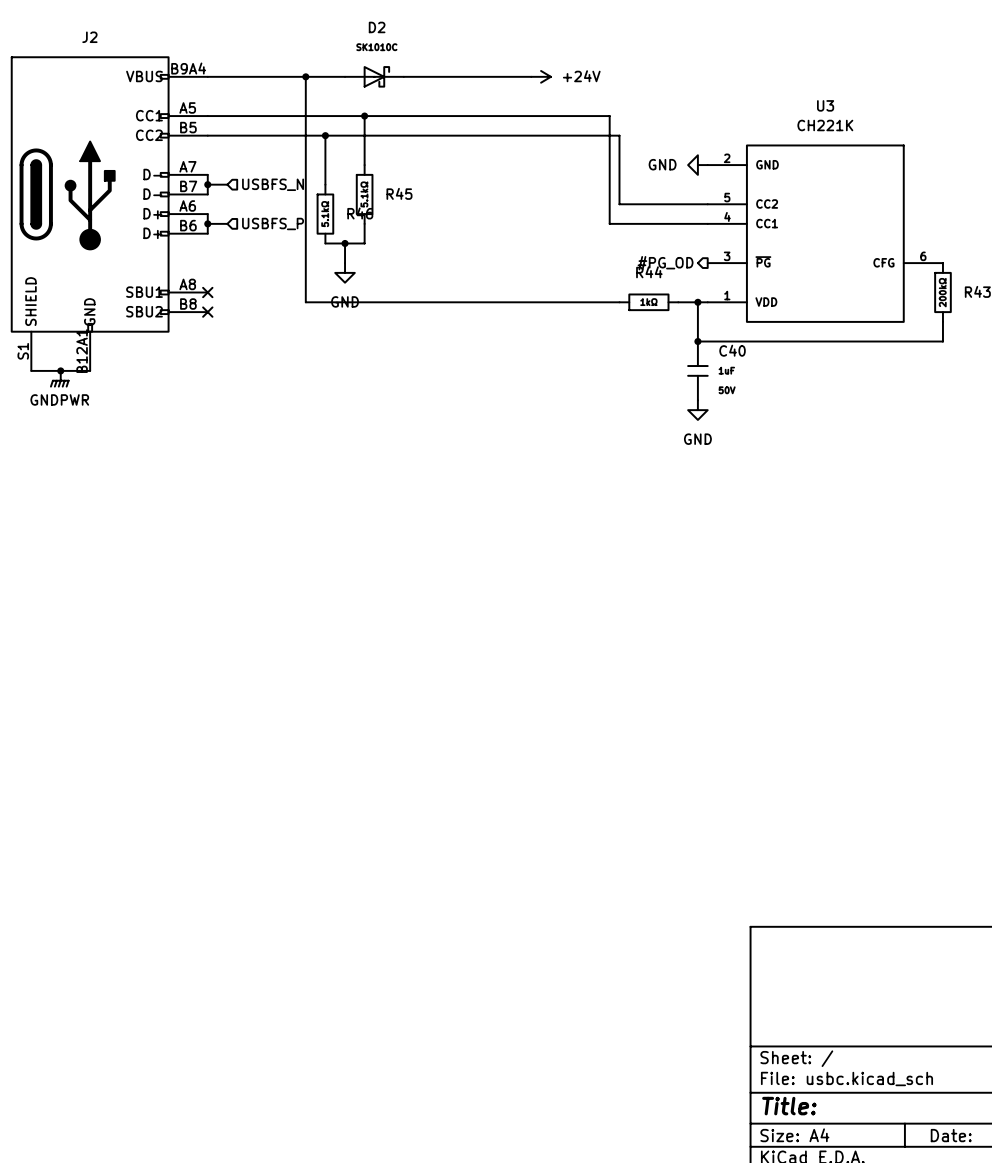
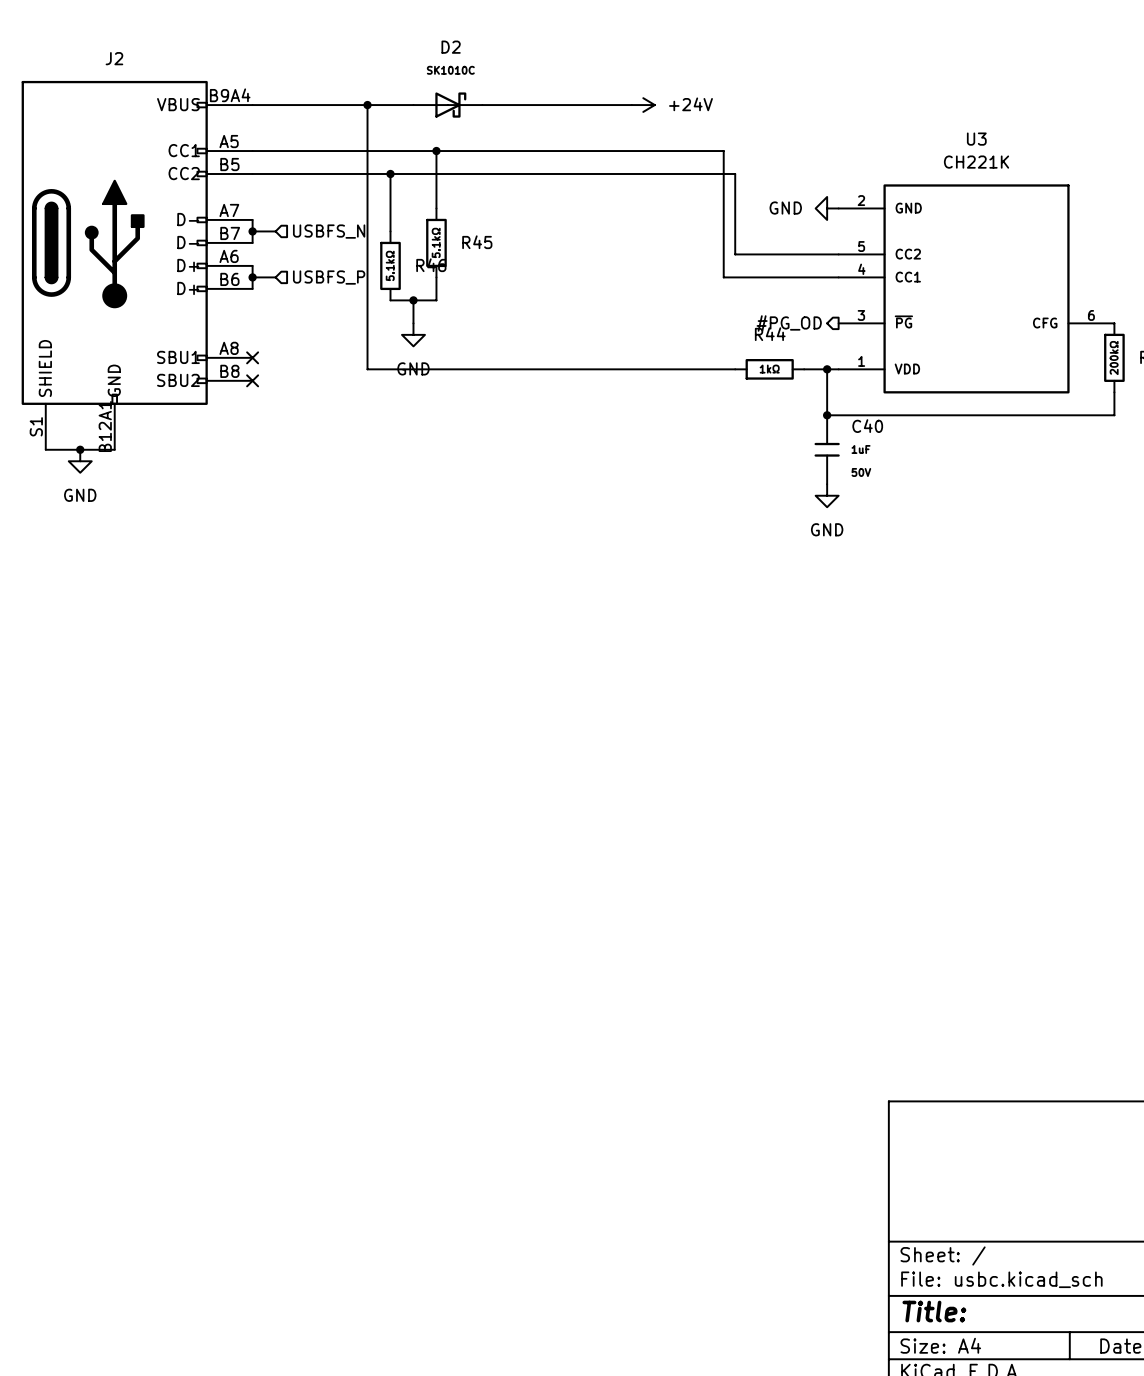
power symbol: GNDPWR (59, 379) -> GND (80, 461)

